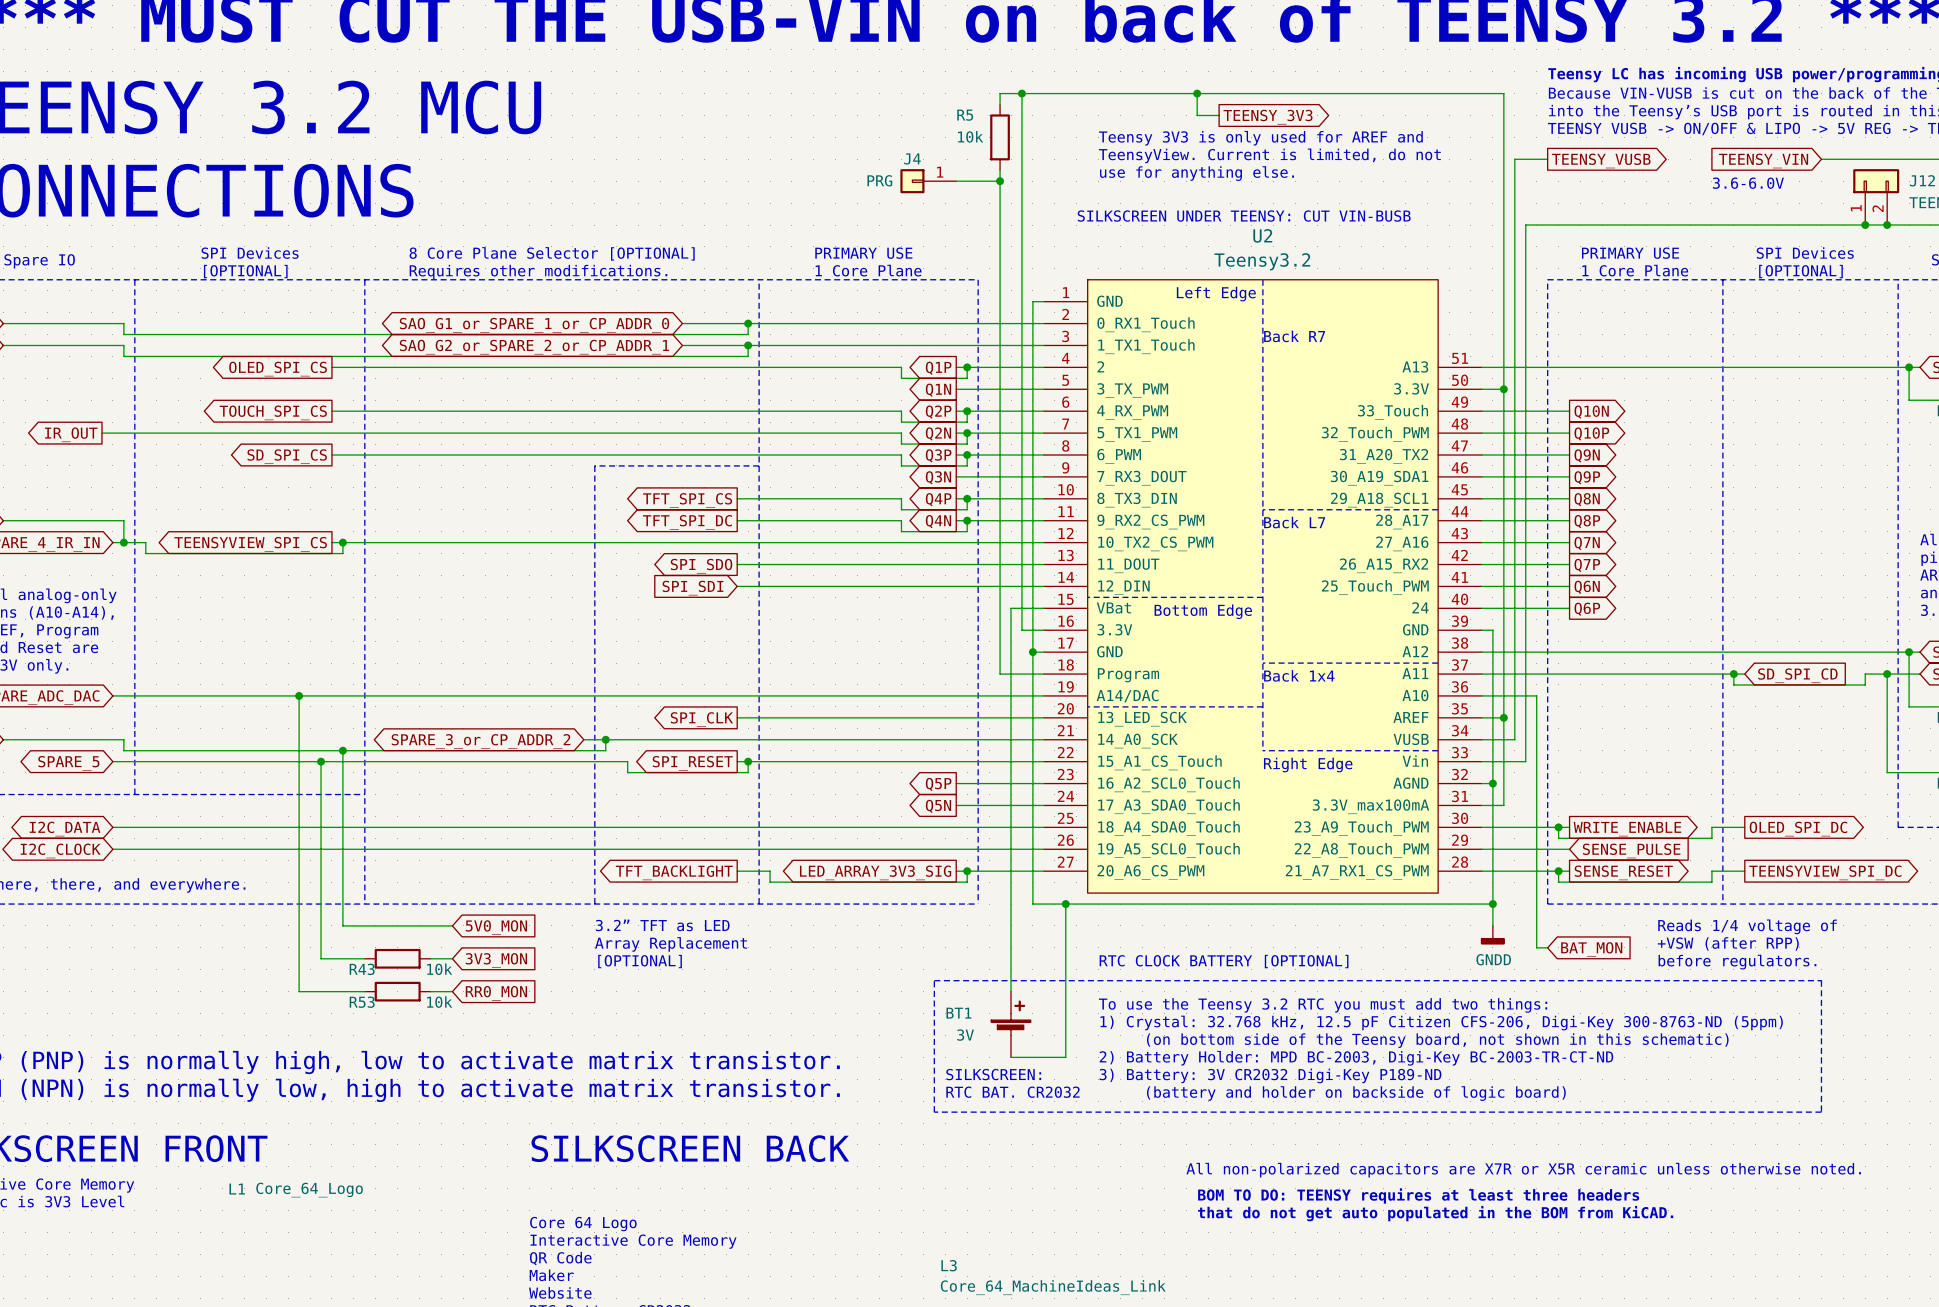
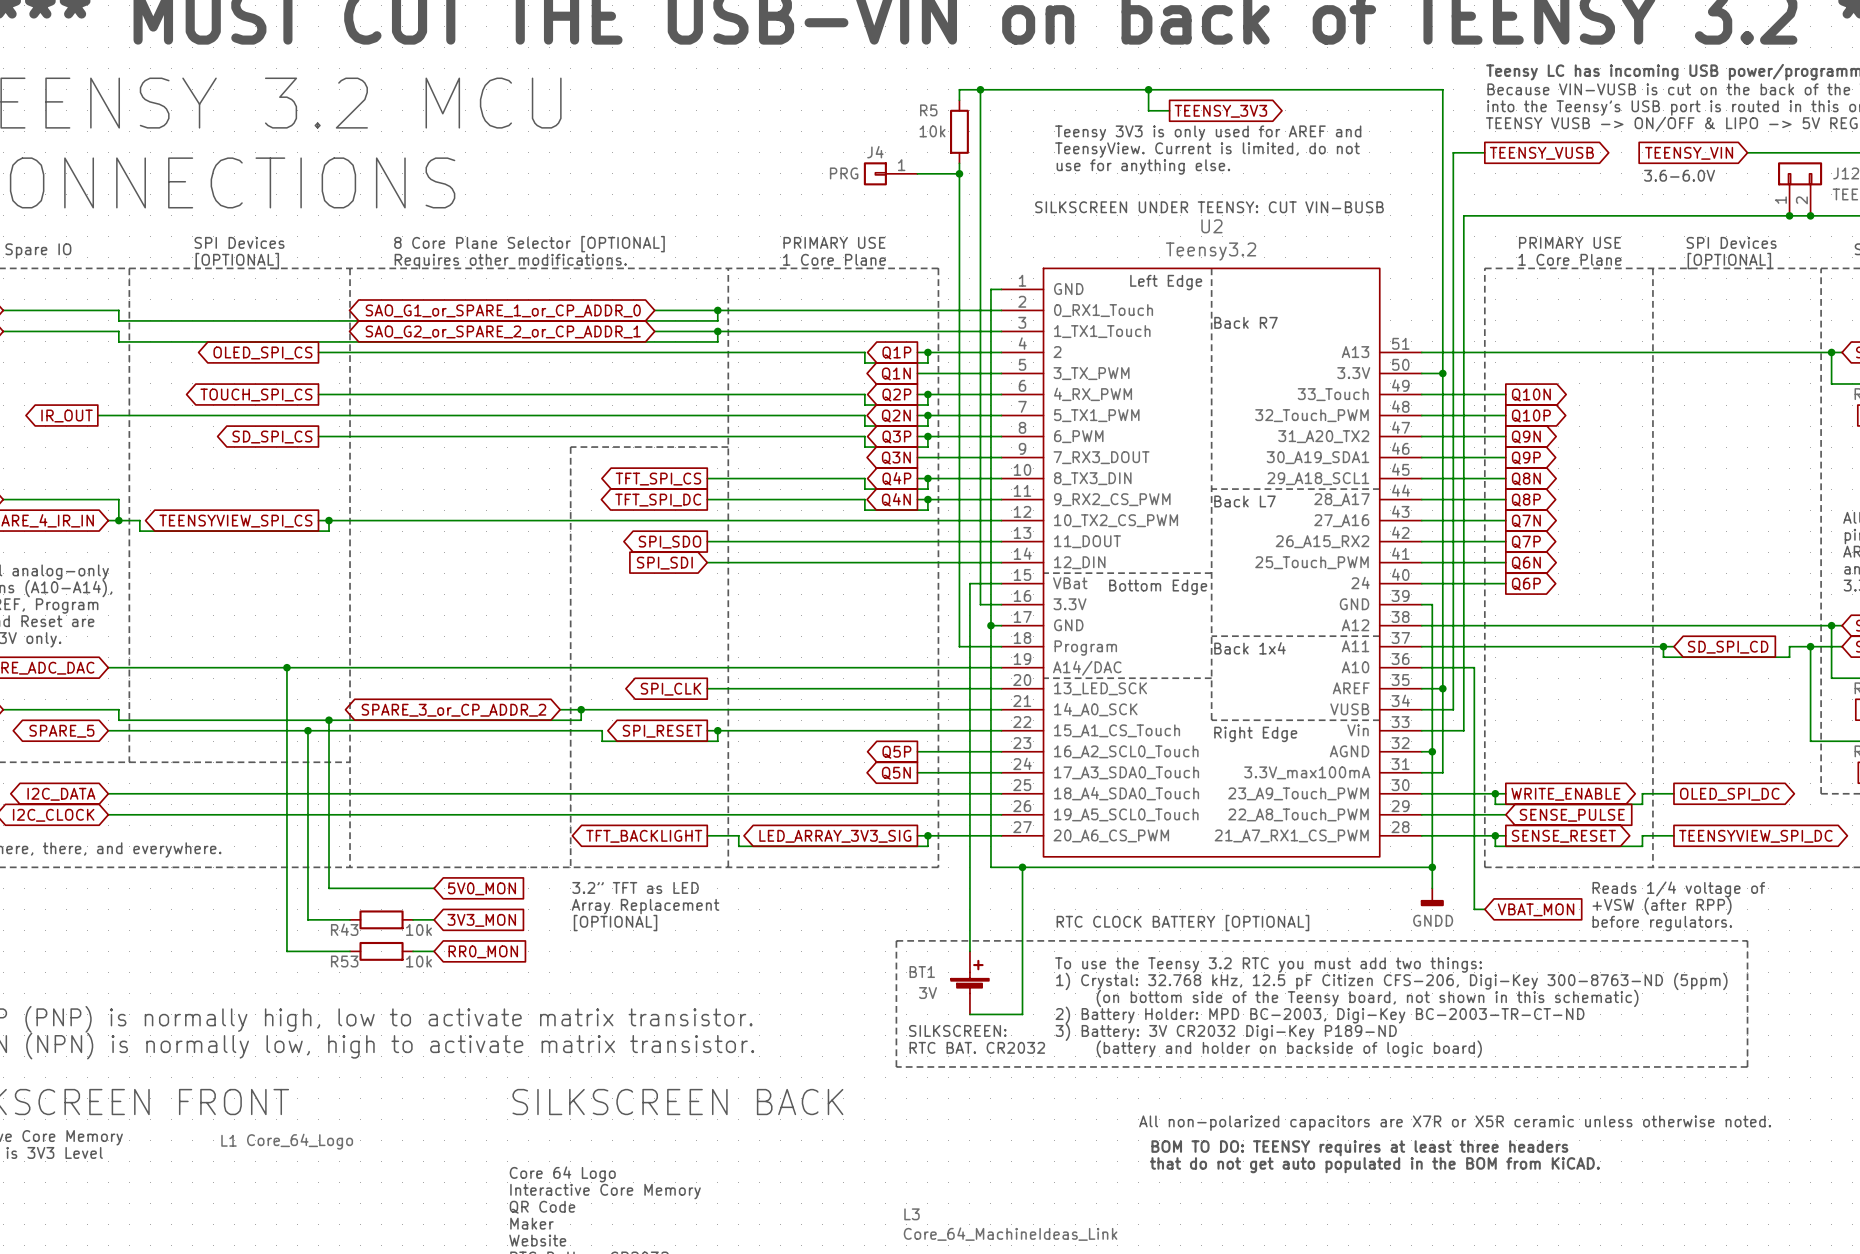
global label: BAT_MON (1591, 949) -> VBAT_MON (1536, 909)

